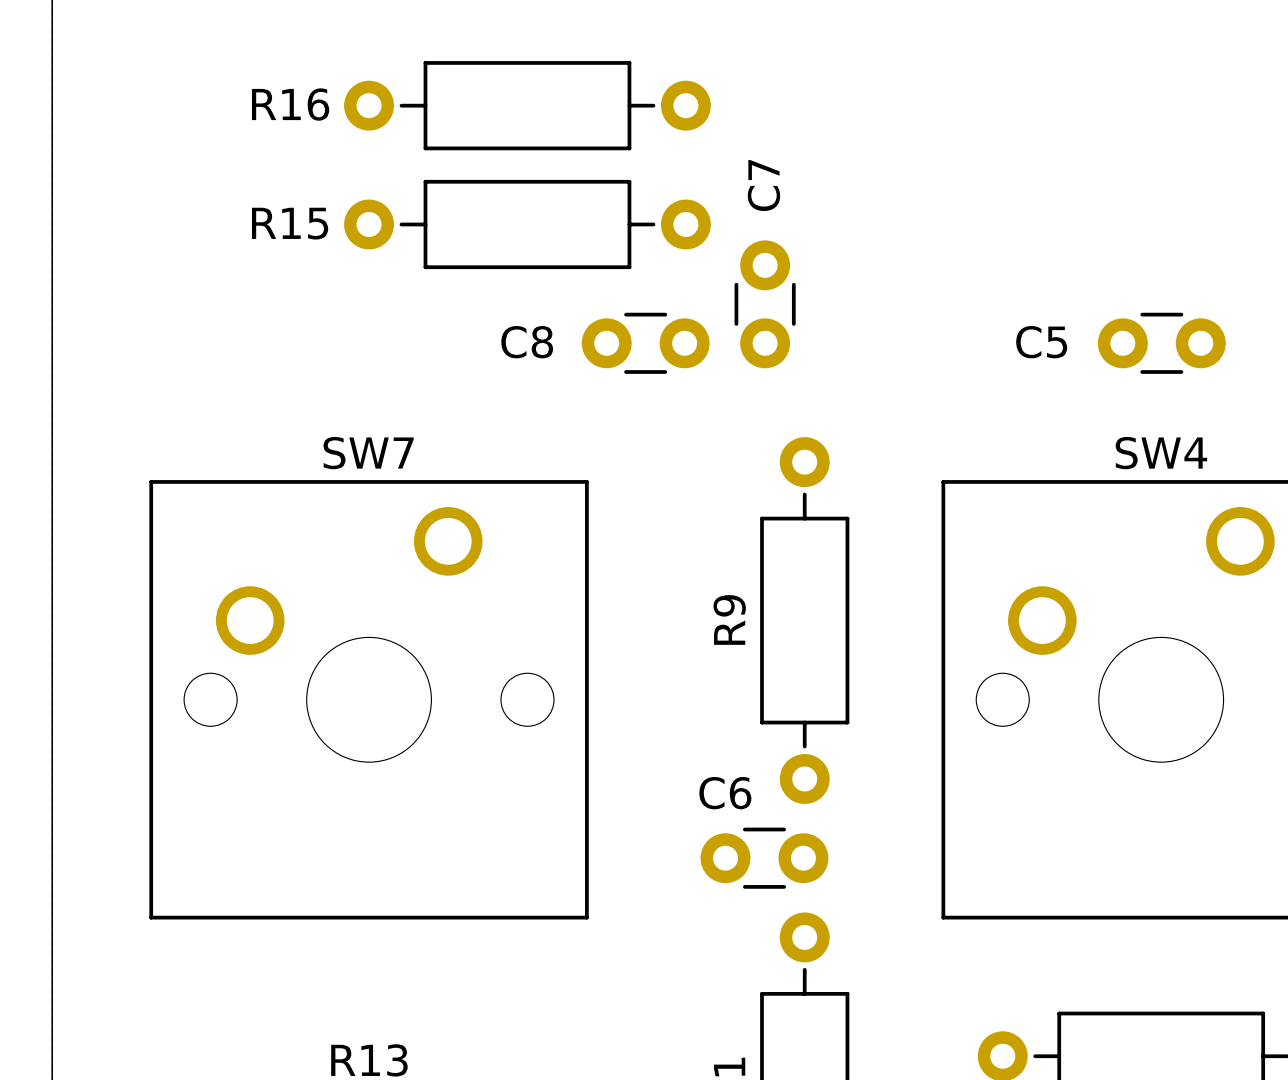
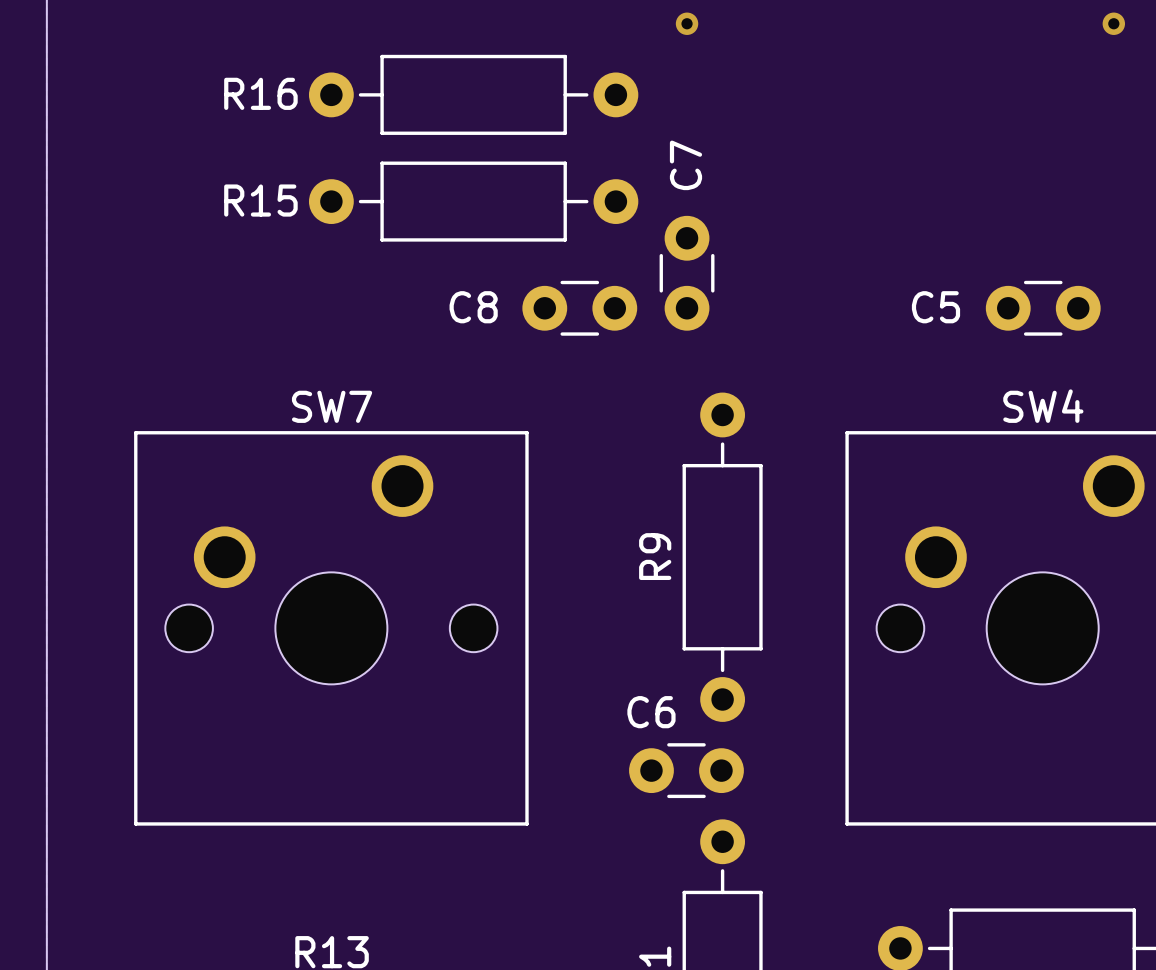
via: none -> (687, 23)
via: none -> (1113, 23)

